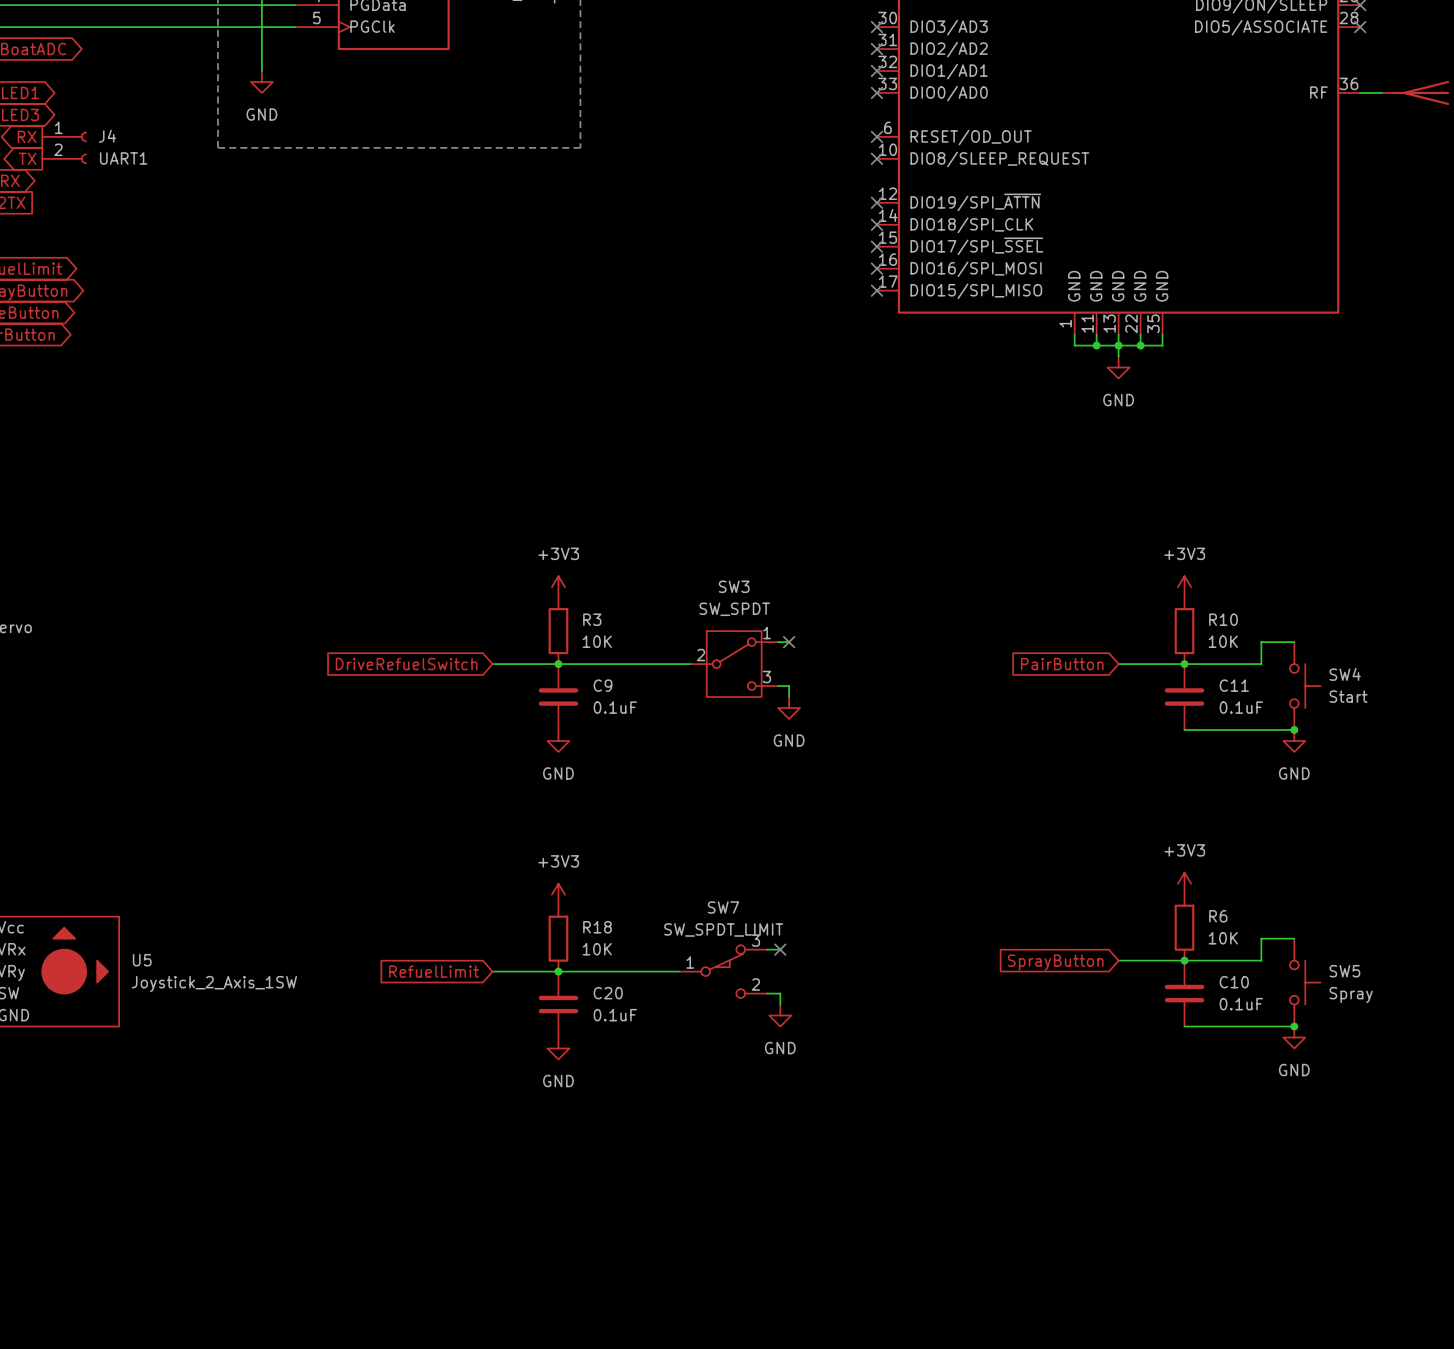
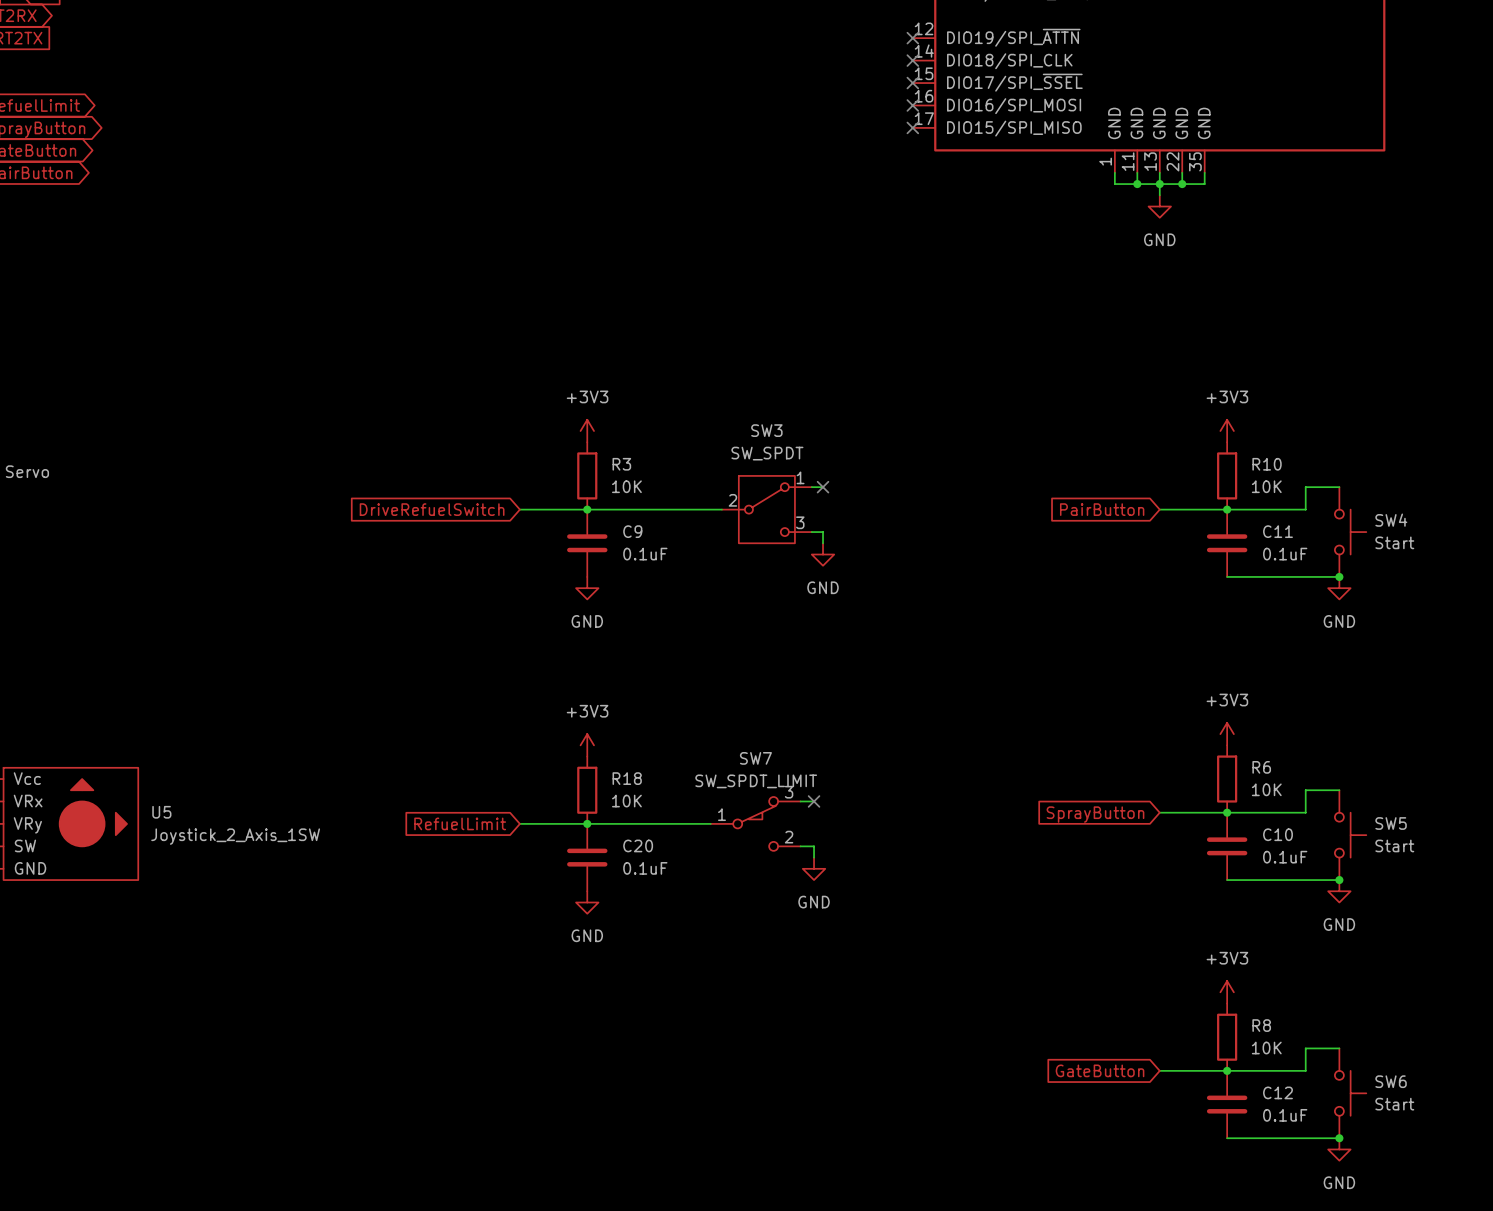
SW5 value: Spray (1351, 994) -> Start (1394, 845)
power symbol: none -> +3V3 (1227, 992)
R8: none -> 10K (1227, 1037)
wire: none -> (1339, 1048) (1305, 1048) (1305, 1070) (1159, 1070)
global label: none -> GateButton (1100, 1070)
junction: none -> (1227, 1070)
SW6: none -> Start (1350, 1093)
C12: none -> 0.1uF (1227, 1104)
wire: none -> (1227, 1138) (1339, 1138)
junction: none -> (1339, 1138)
power symbol: none -> GND (1339, 1149)

